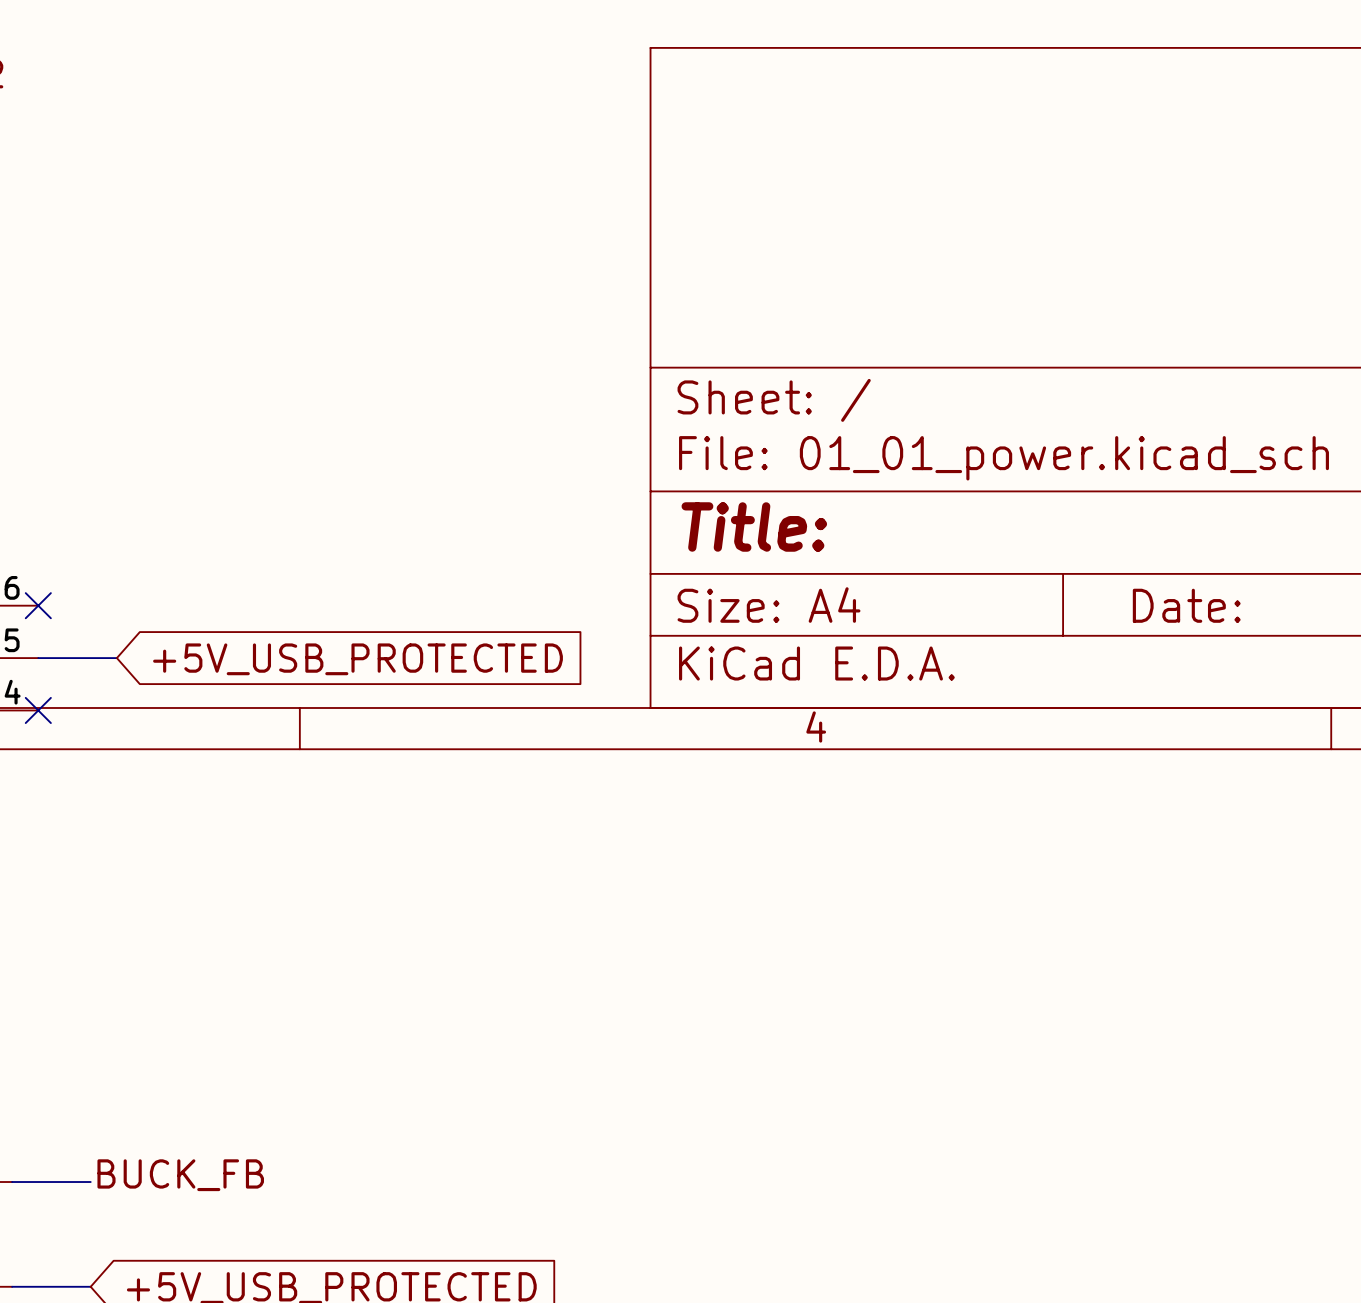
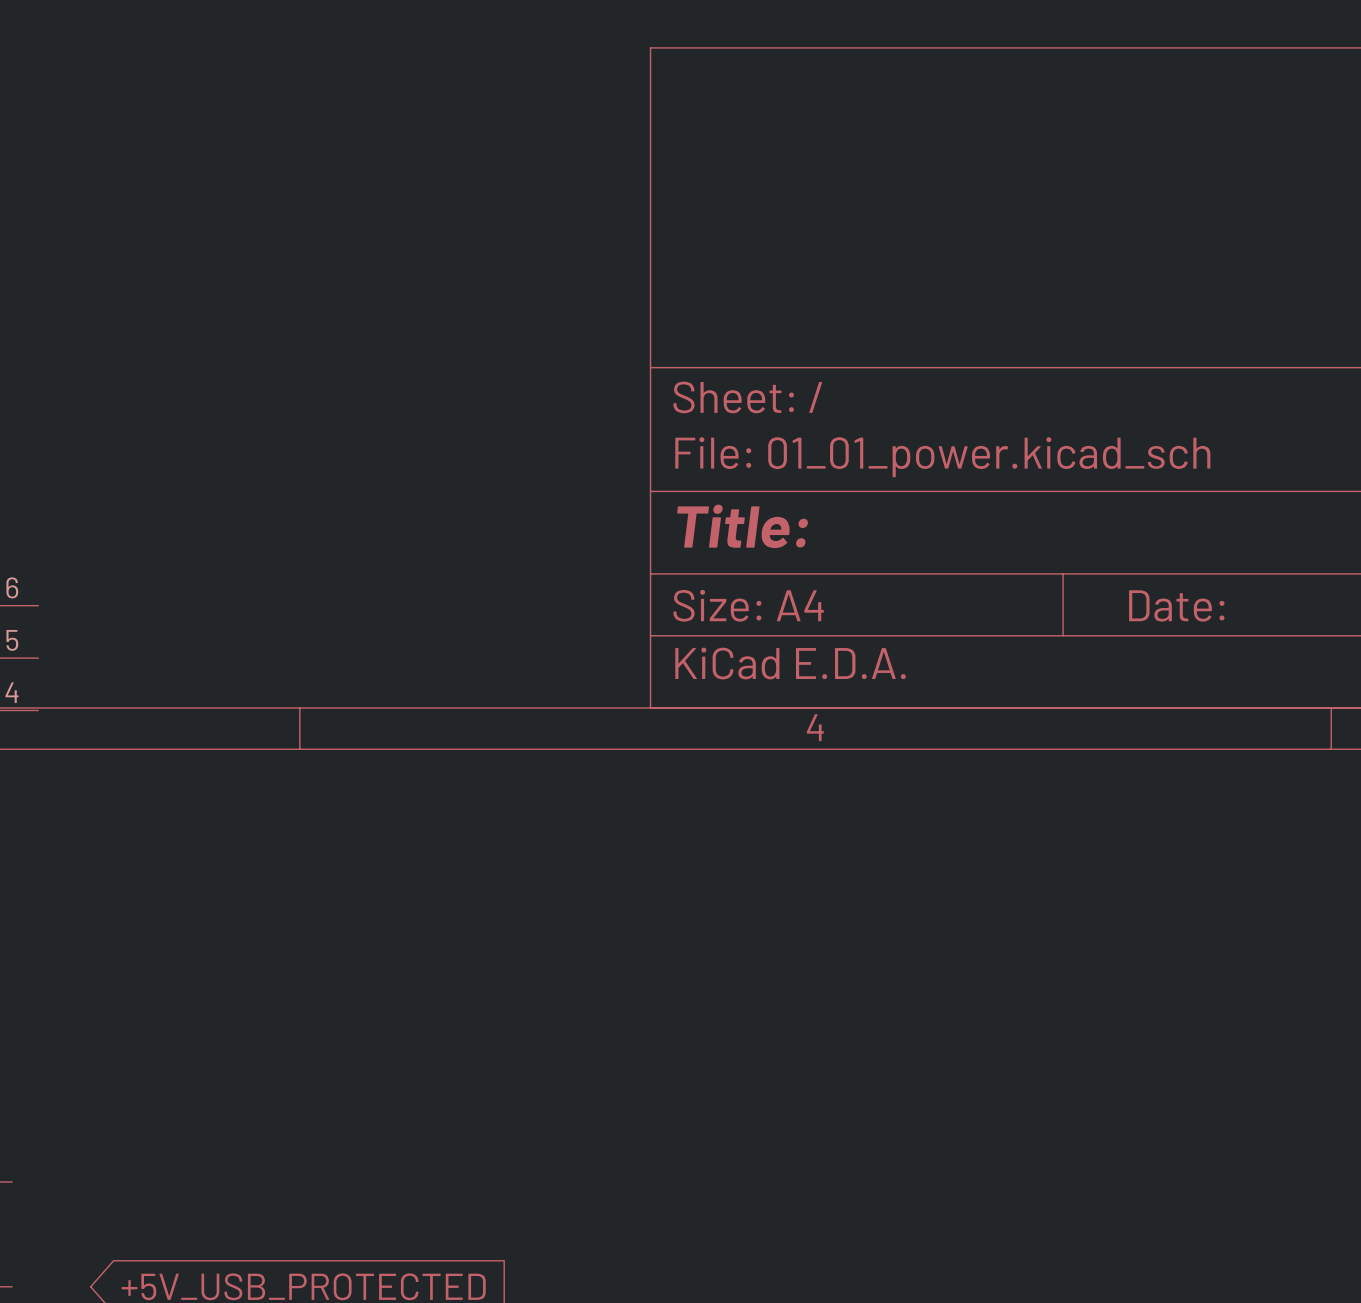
no-connect mark: (38, 605) -> none
wire: (38, 658) (116, 658) -> none
global label: +5V_USB_PROTECTED (358, 659) -> none
no-connect mark: (38, 710) -> none
label: BUCK_FB (180, 1175) -> none
wire: (12, 1182) (90, 1182) -> none
wire: (12, 1286) (90, 1286) -> none

